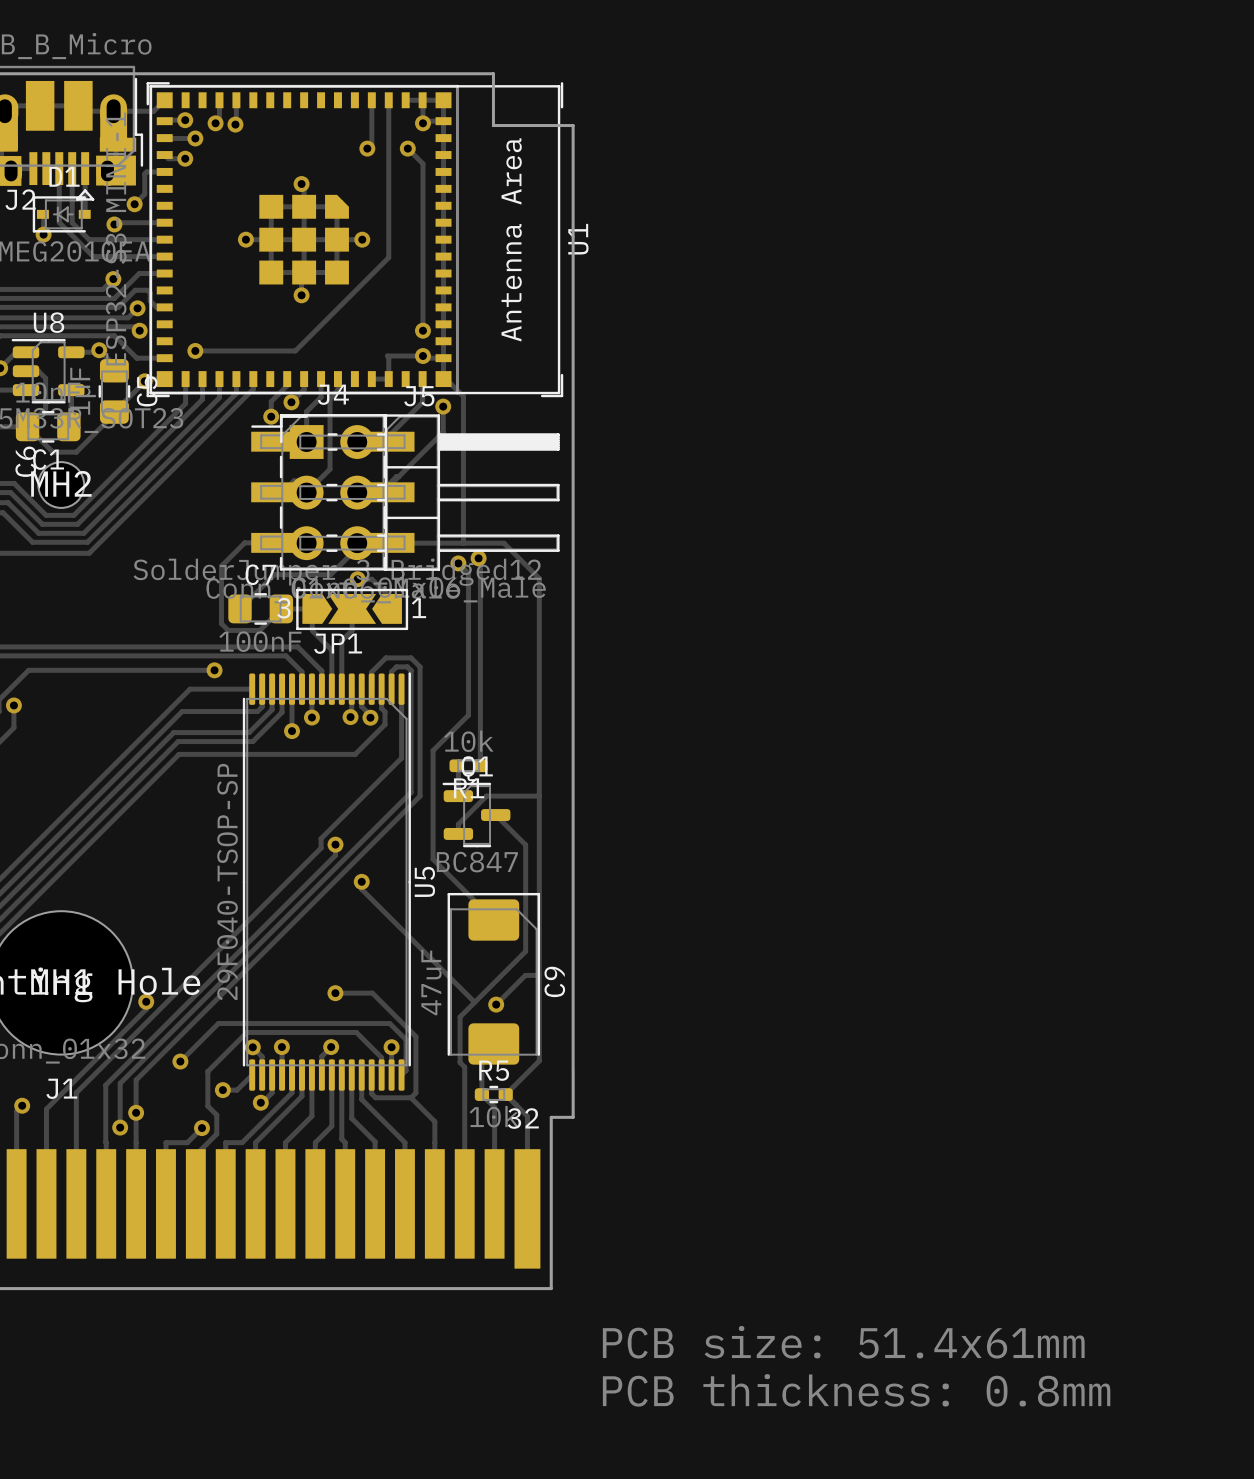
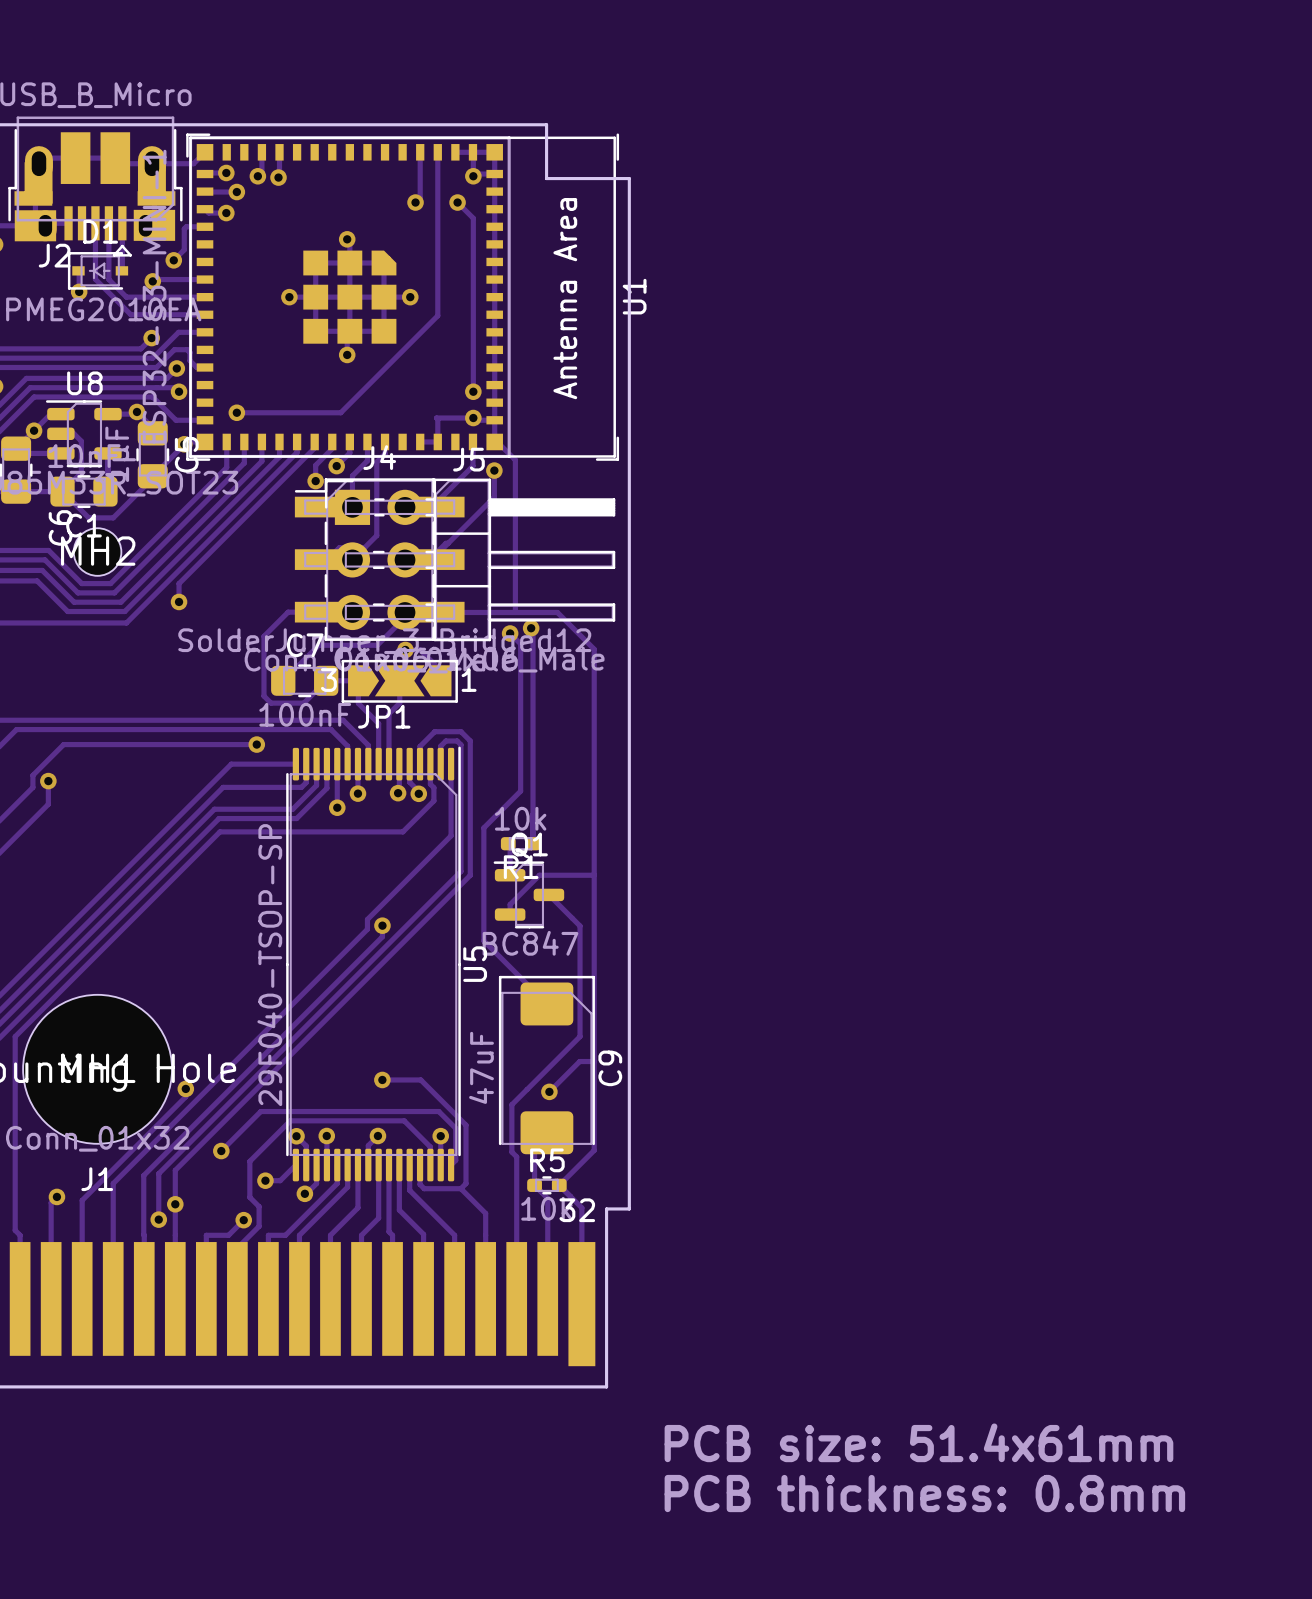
track: none -> (314, 441) (314, 448) (179, 583) (179, 601)
via: none -> (179, 601)
track: (361, 881) (361, 889) (474, 1002) -> none
via: (361, 881) -> none

